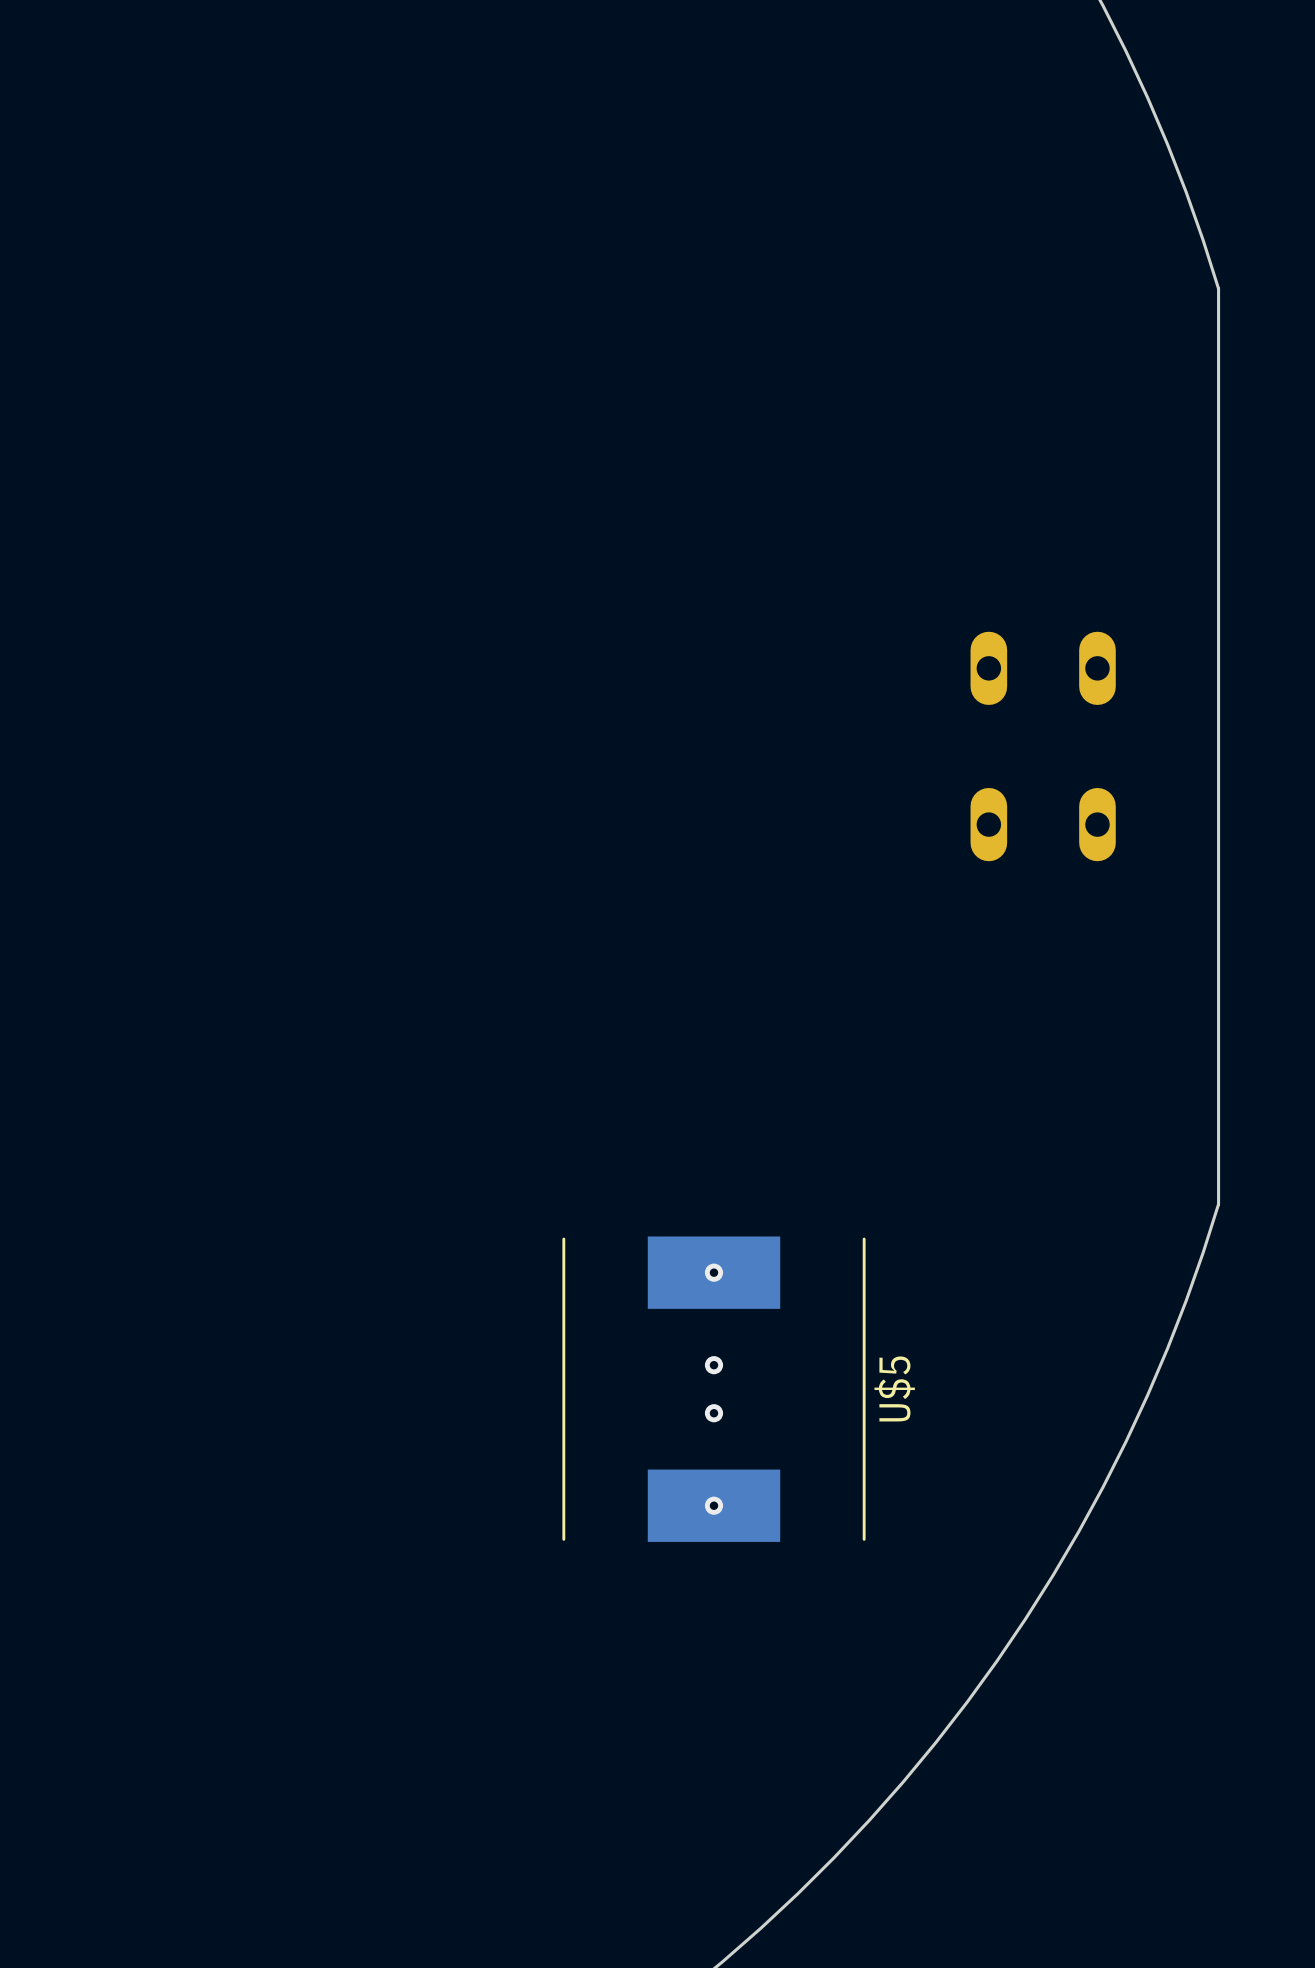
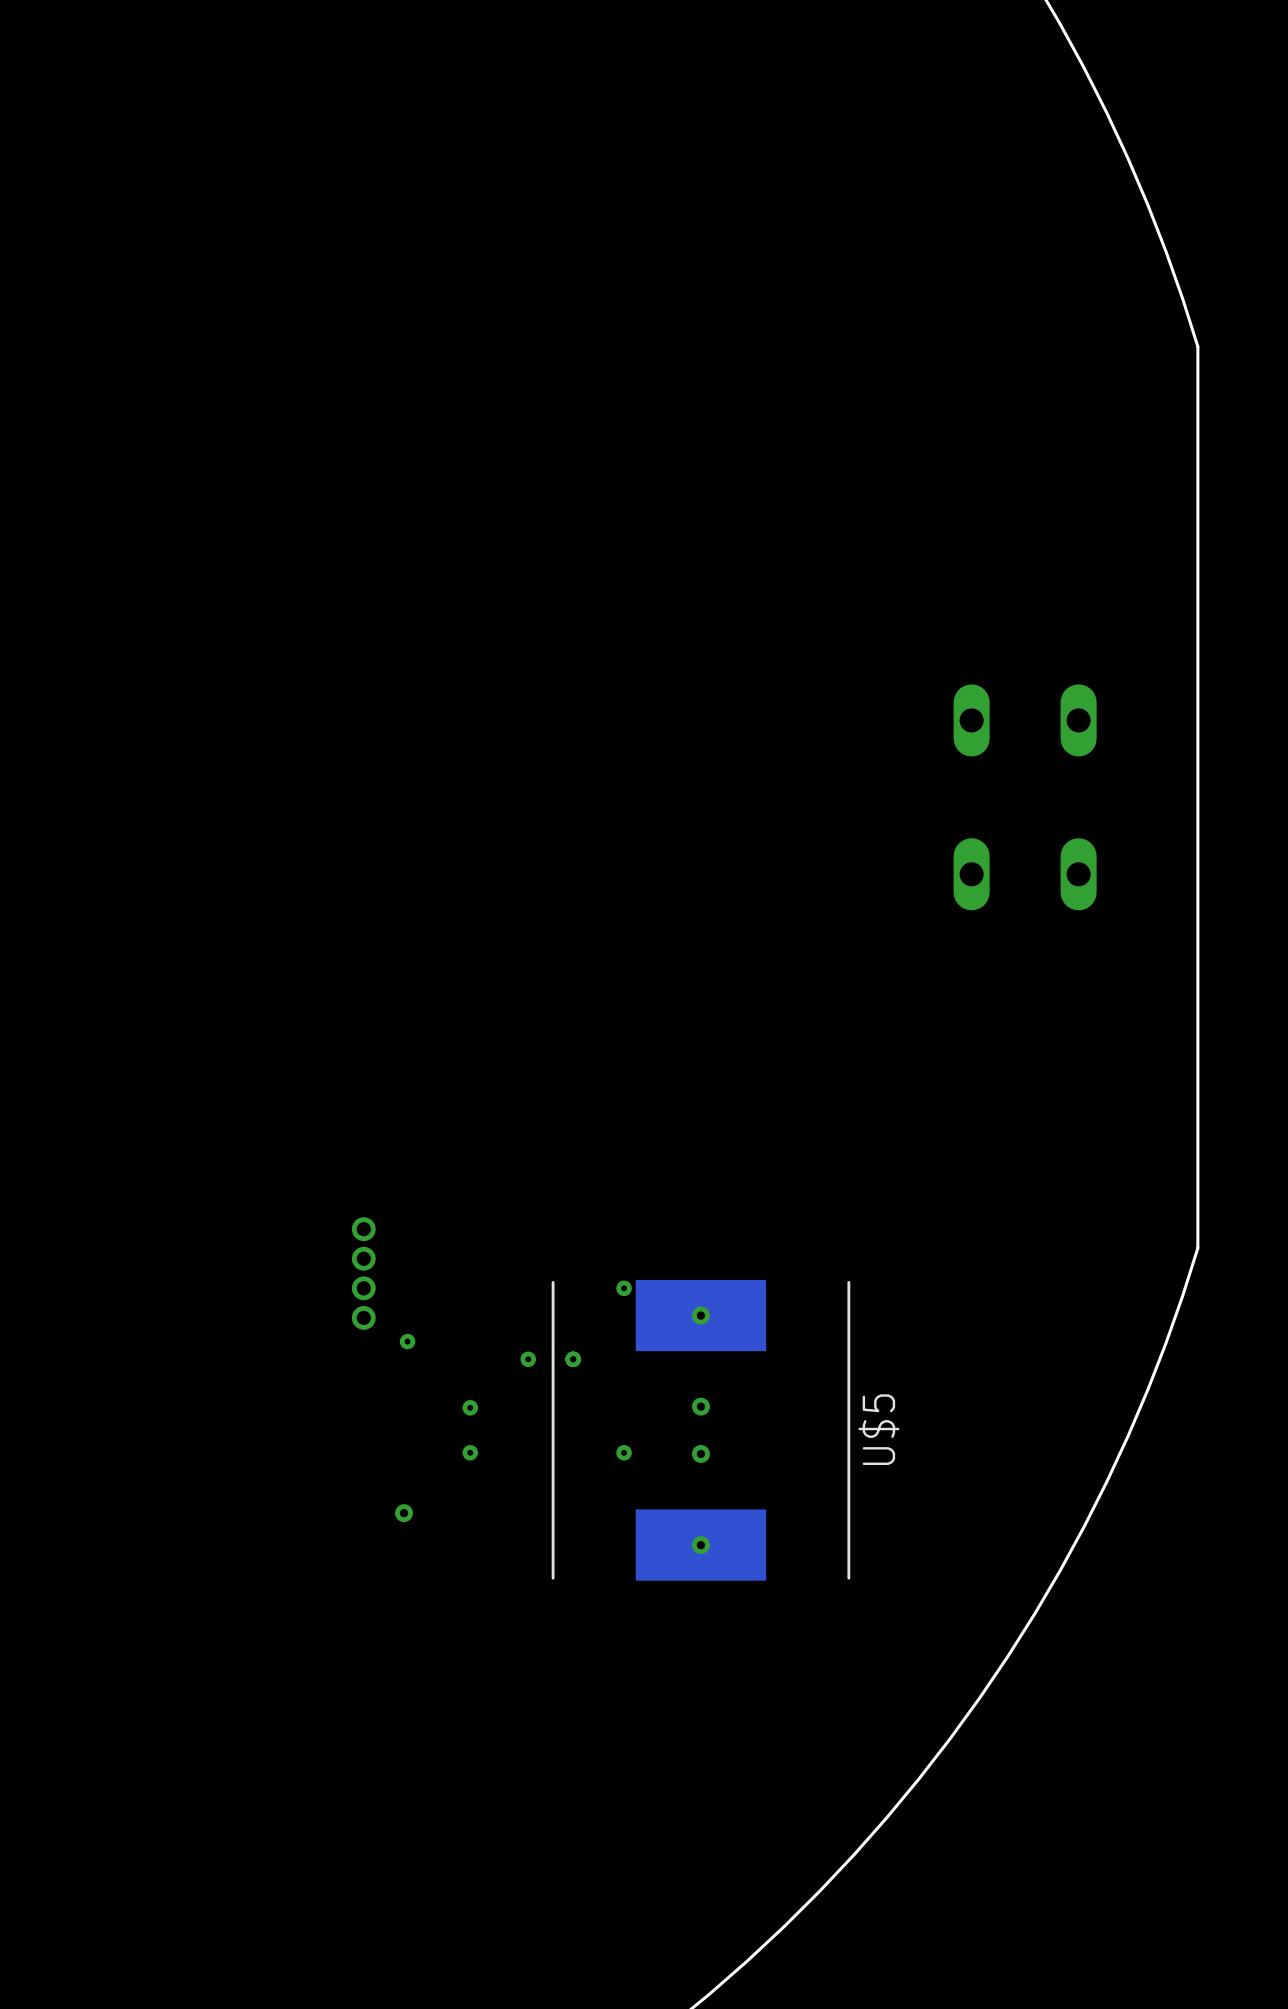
via: none -> (363, 1229)
via: none -> (363, 1258)
via: none -> (363, 1288)
via: none -> (624, 1288)
via: none -> (363, 1317)
via: none -> (407, 1341)
via: none -> (528, 1359)
via: none -> (573, 1359)
via: none -> (470, 1407)
via: none -> (470, 1452)
via: none -> (624, 1452)
via: none -> (404, 1513)

